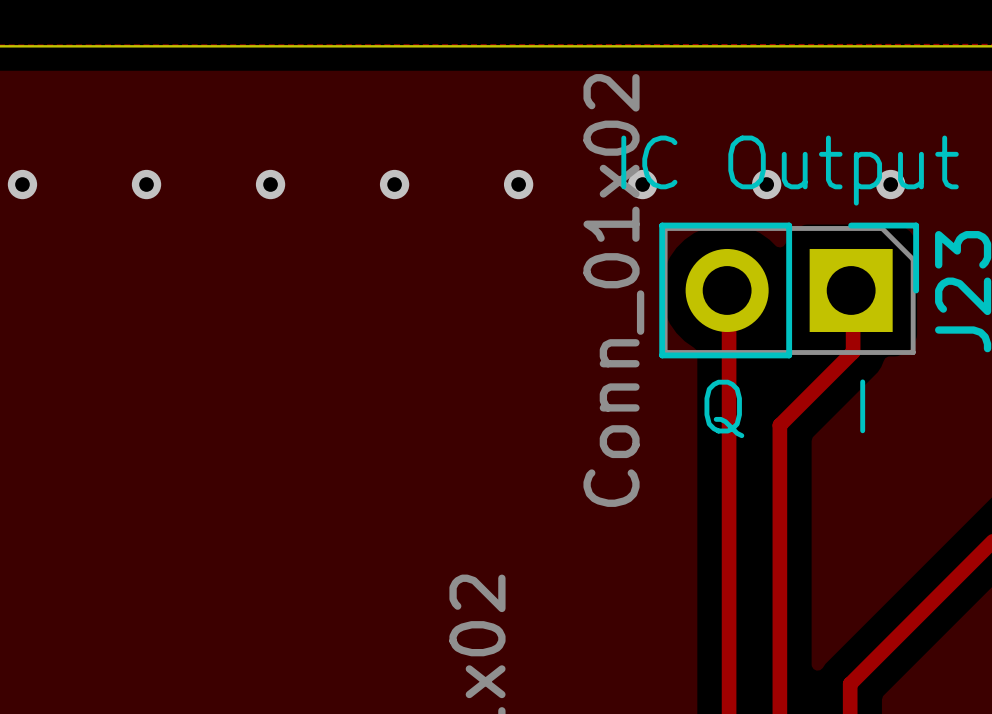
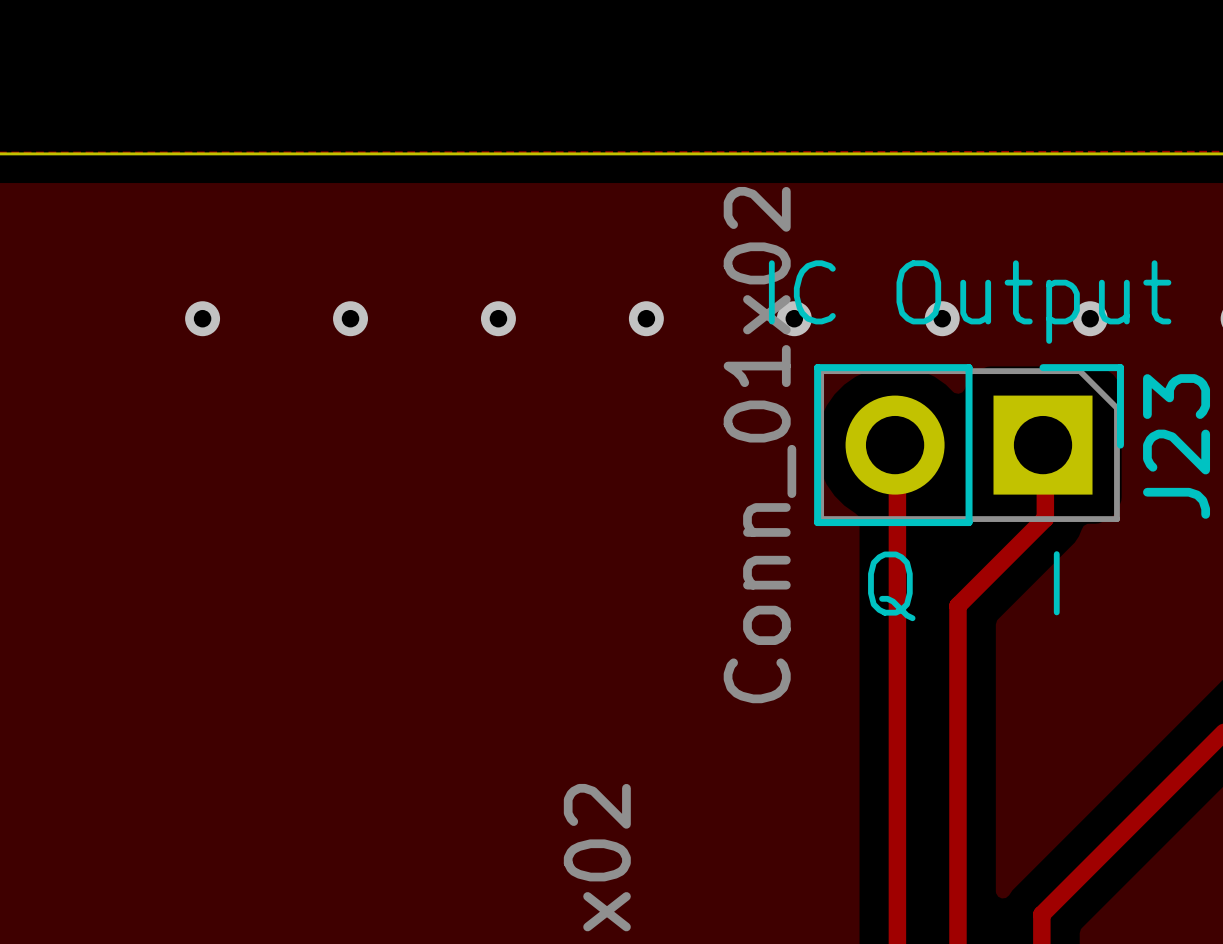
via: (22, 184) -> none

